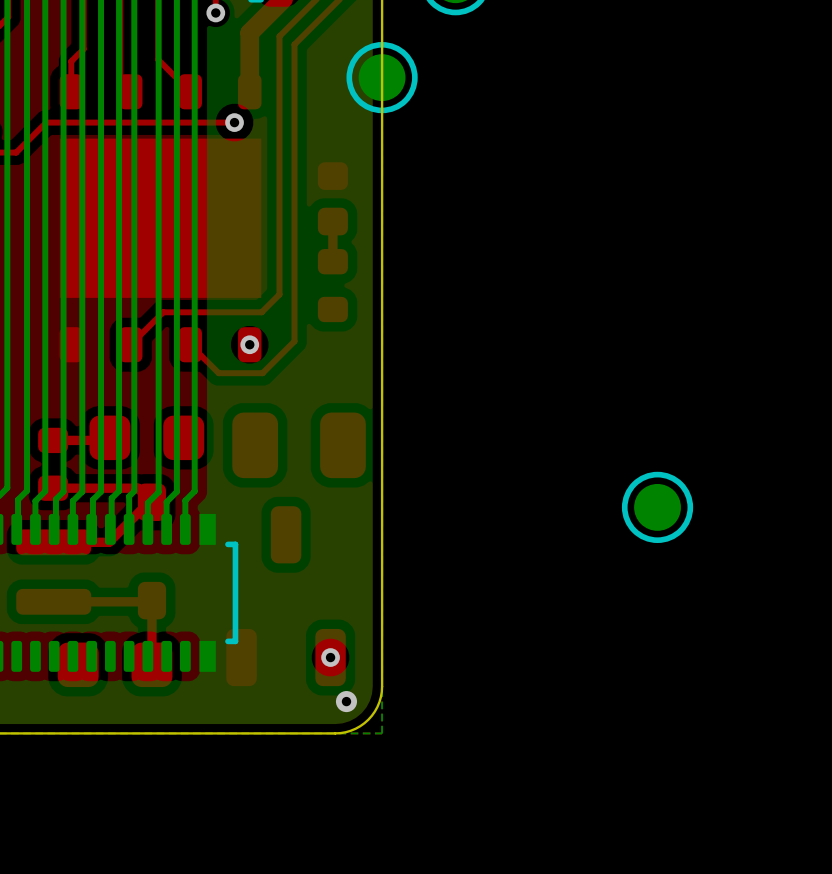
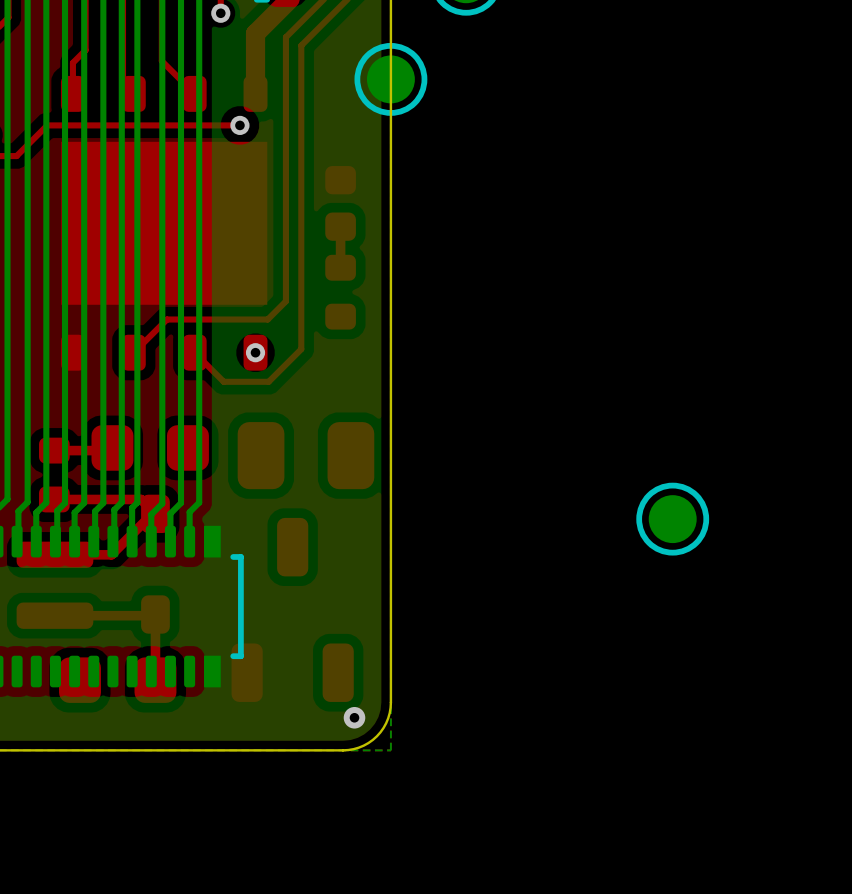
via: (330, 657) -> none

